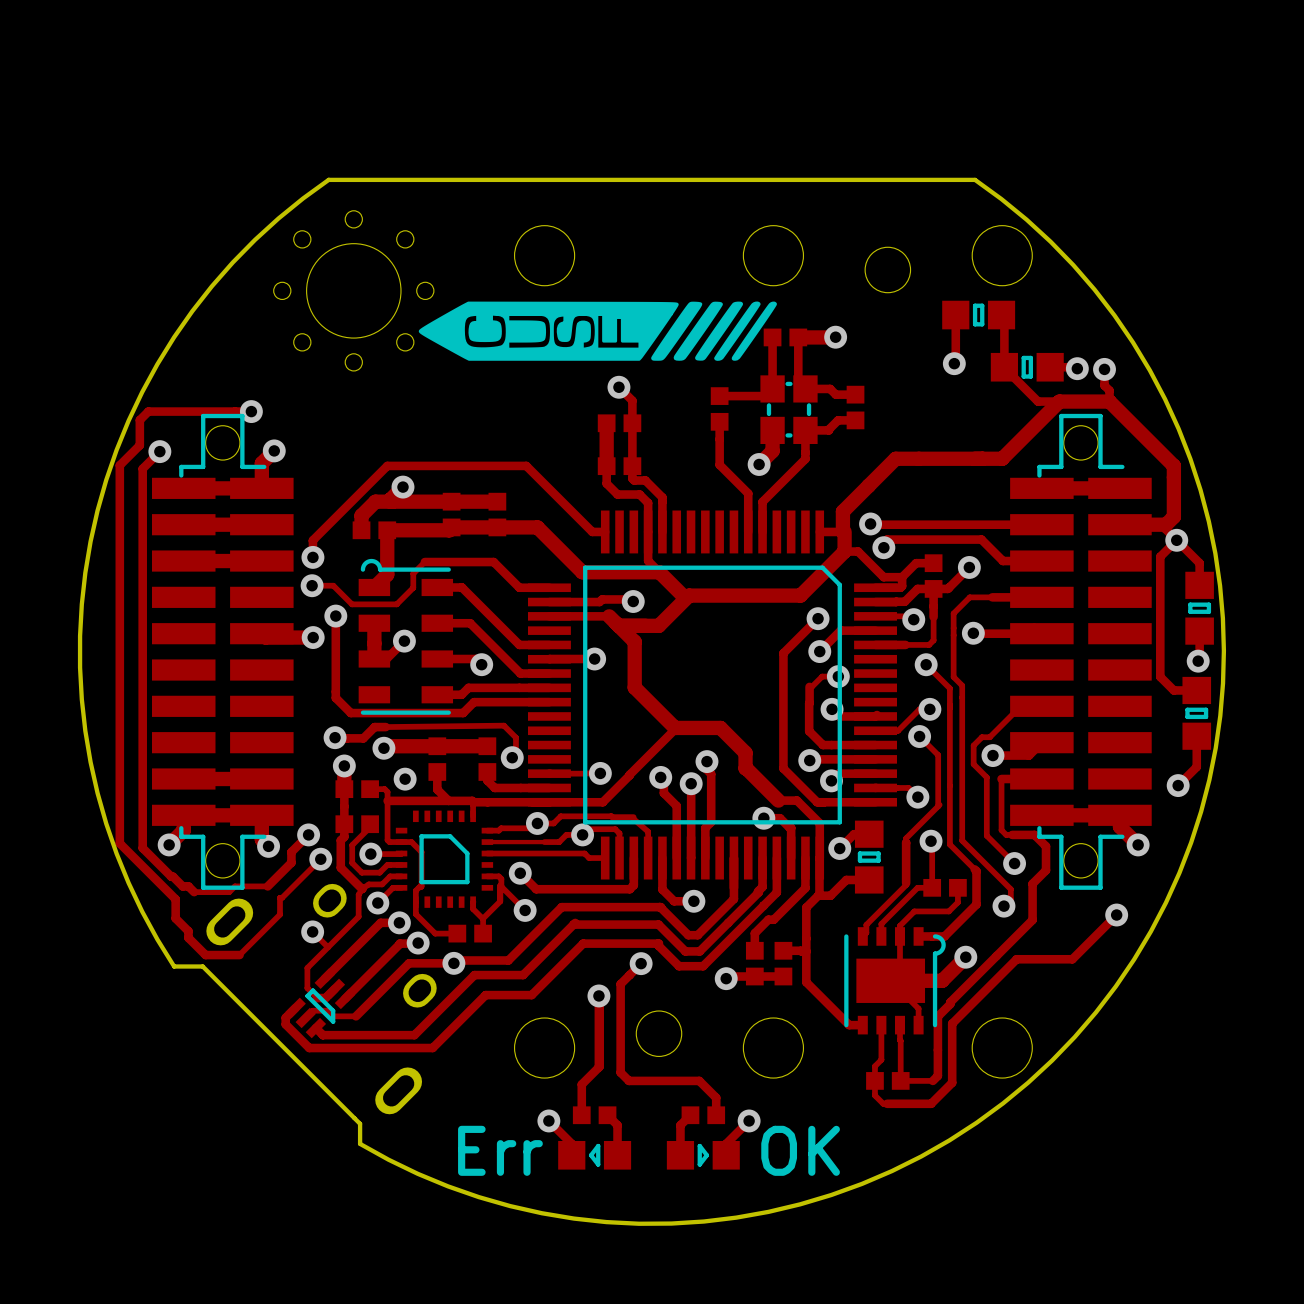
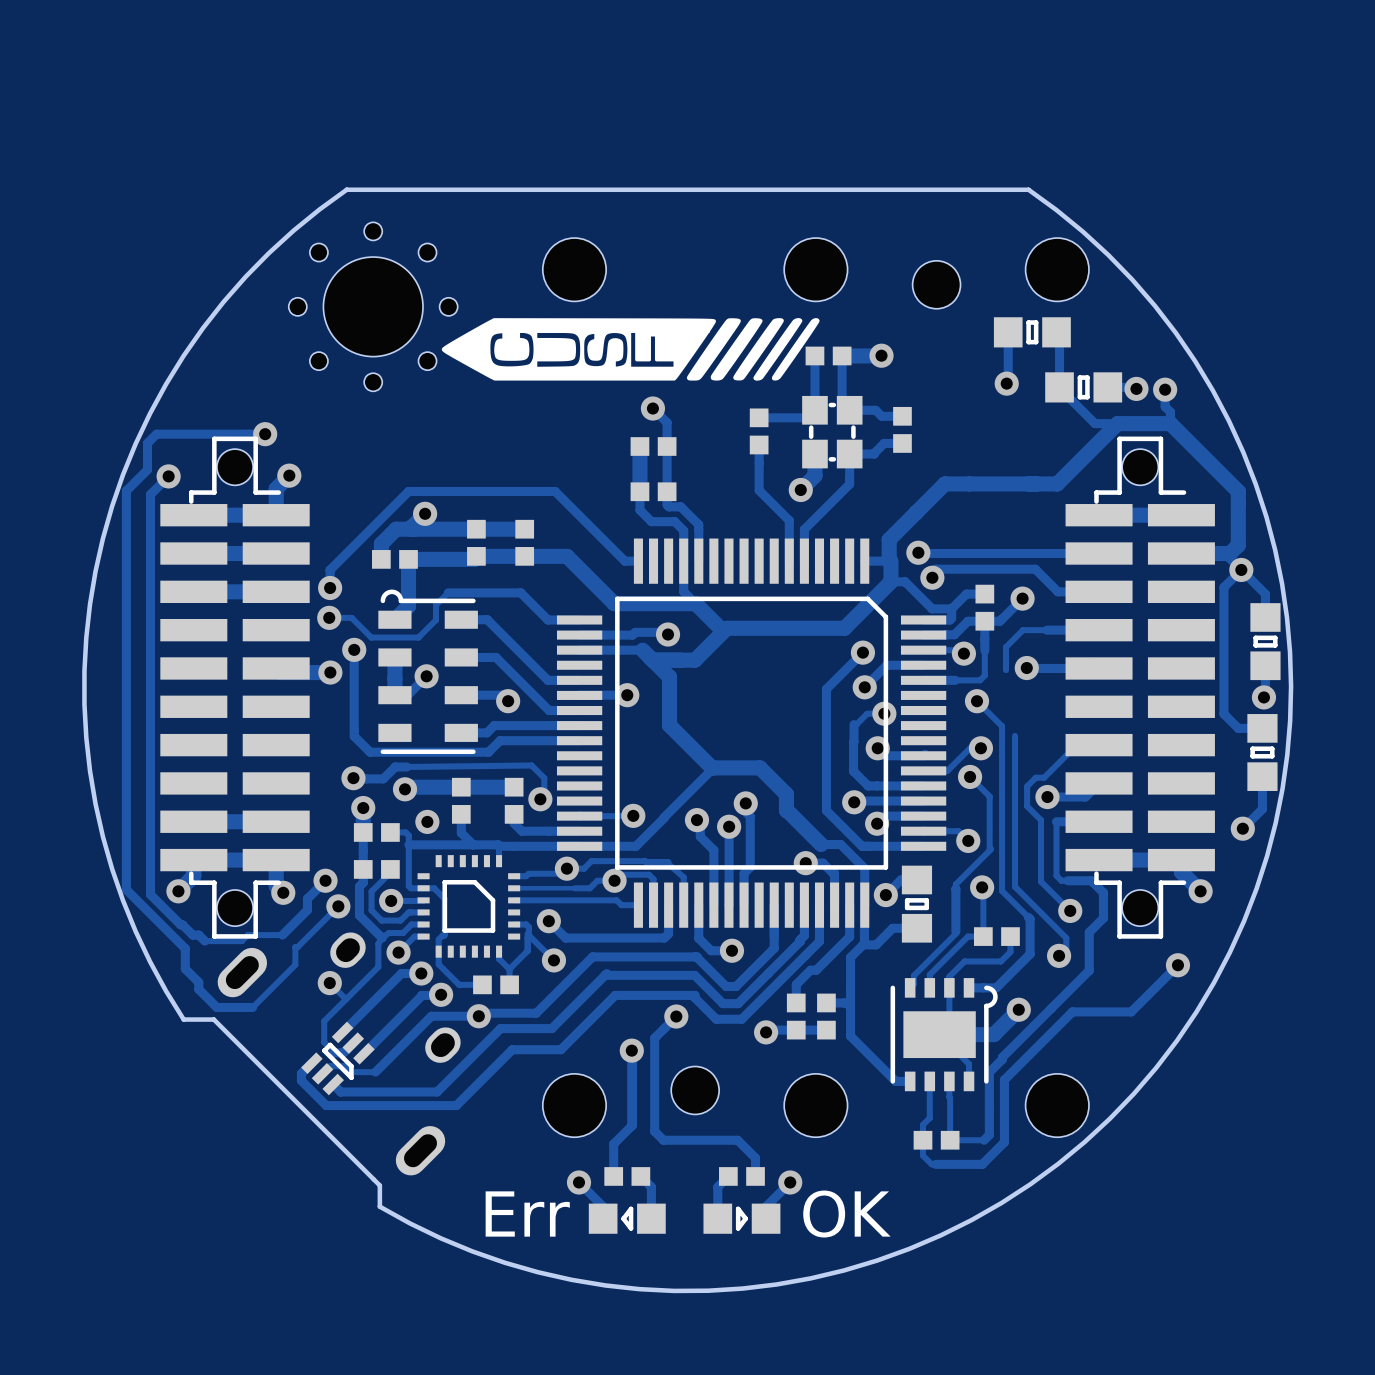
track: (953, 635) (953, 677) (962, 685) (962, 697) -> none

